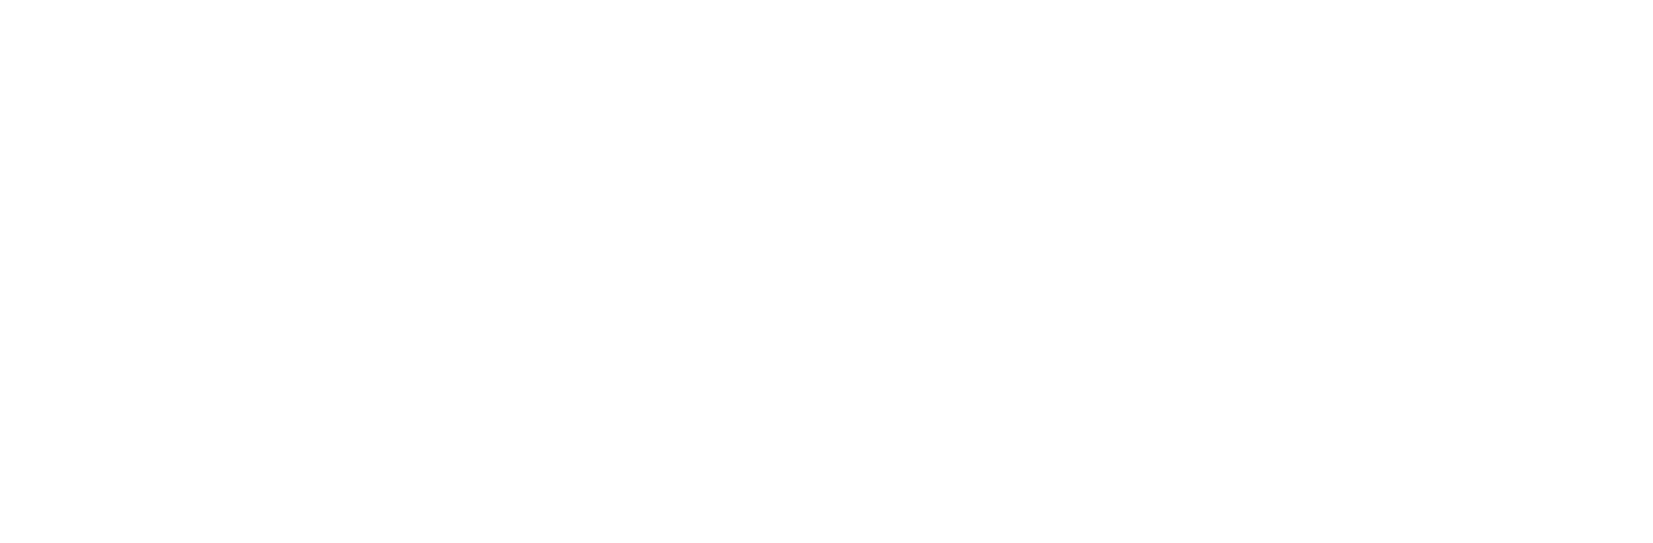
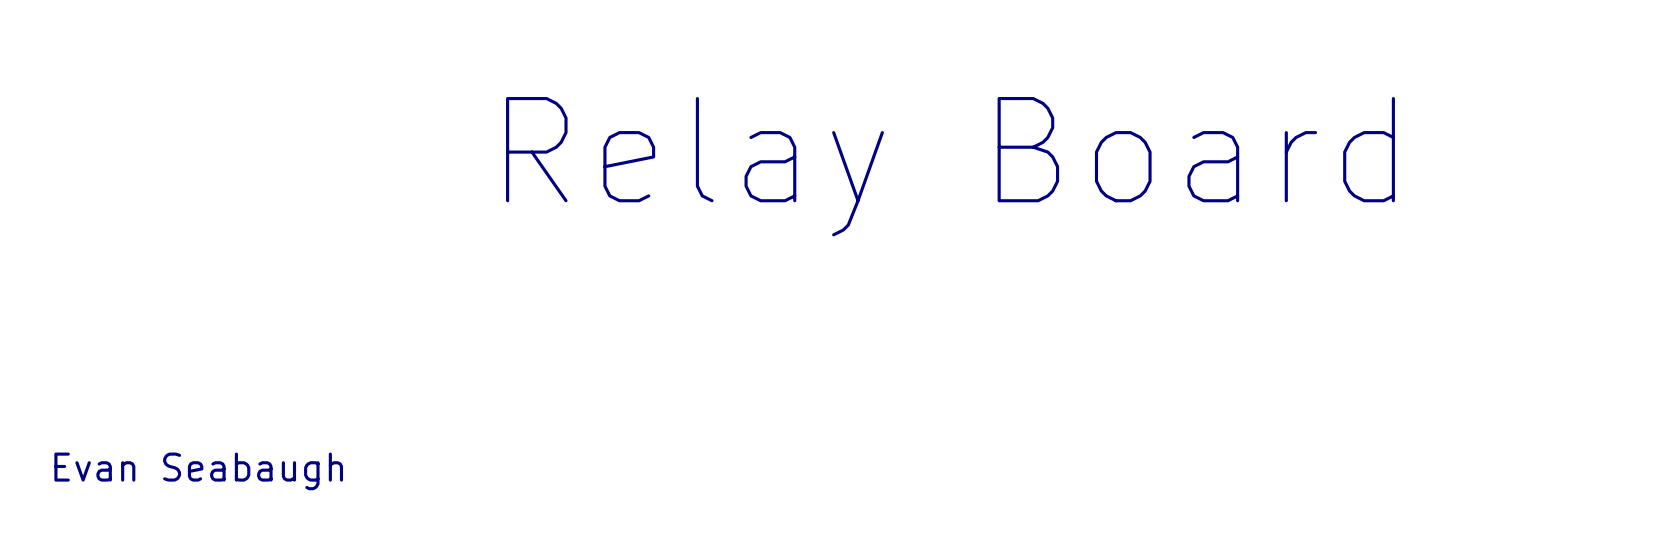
text: none -> Relay Board (950, 166)
text: none -> Evan Seabaugh (198, 471)

